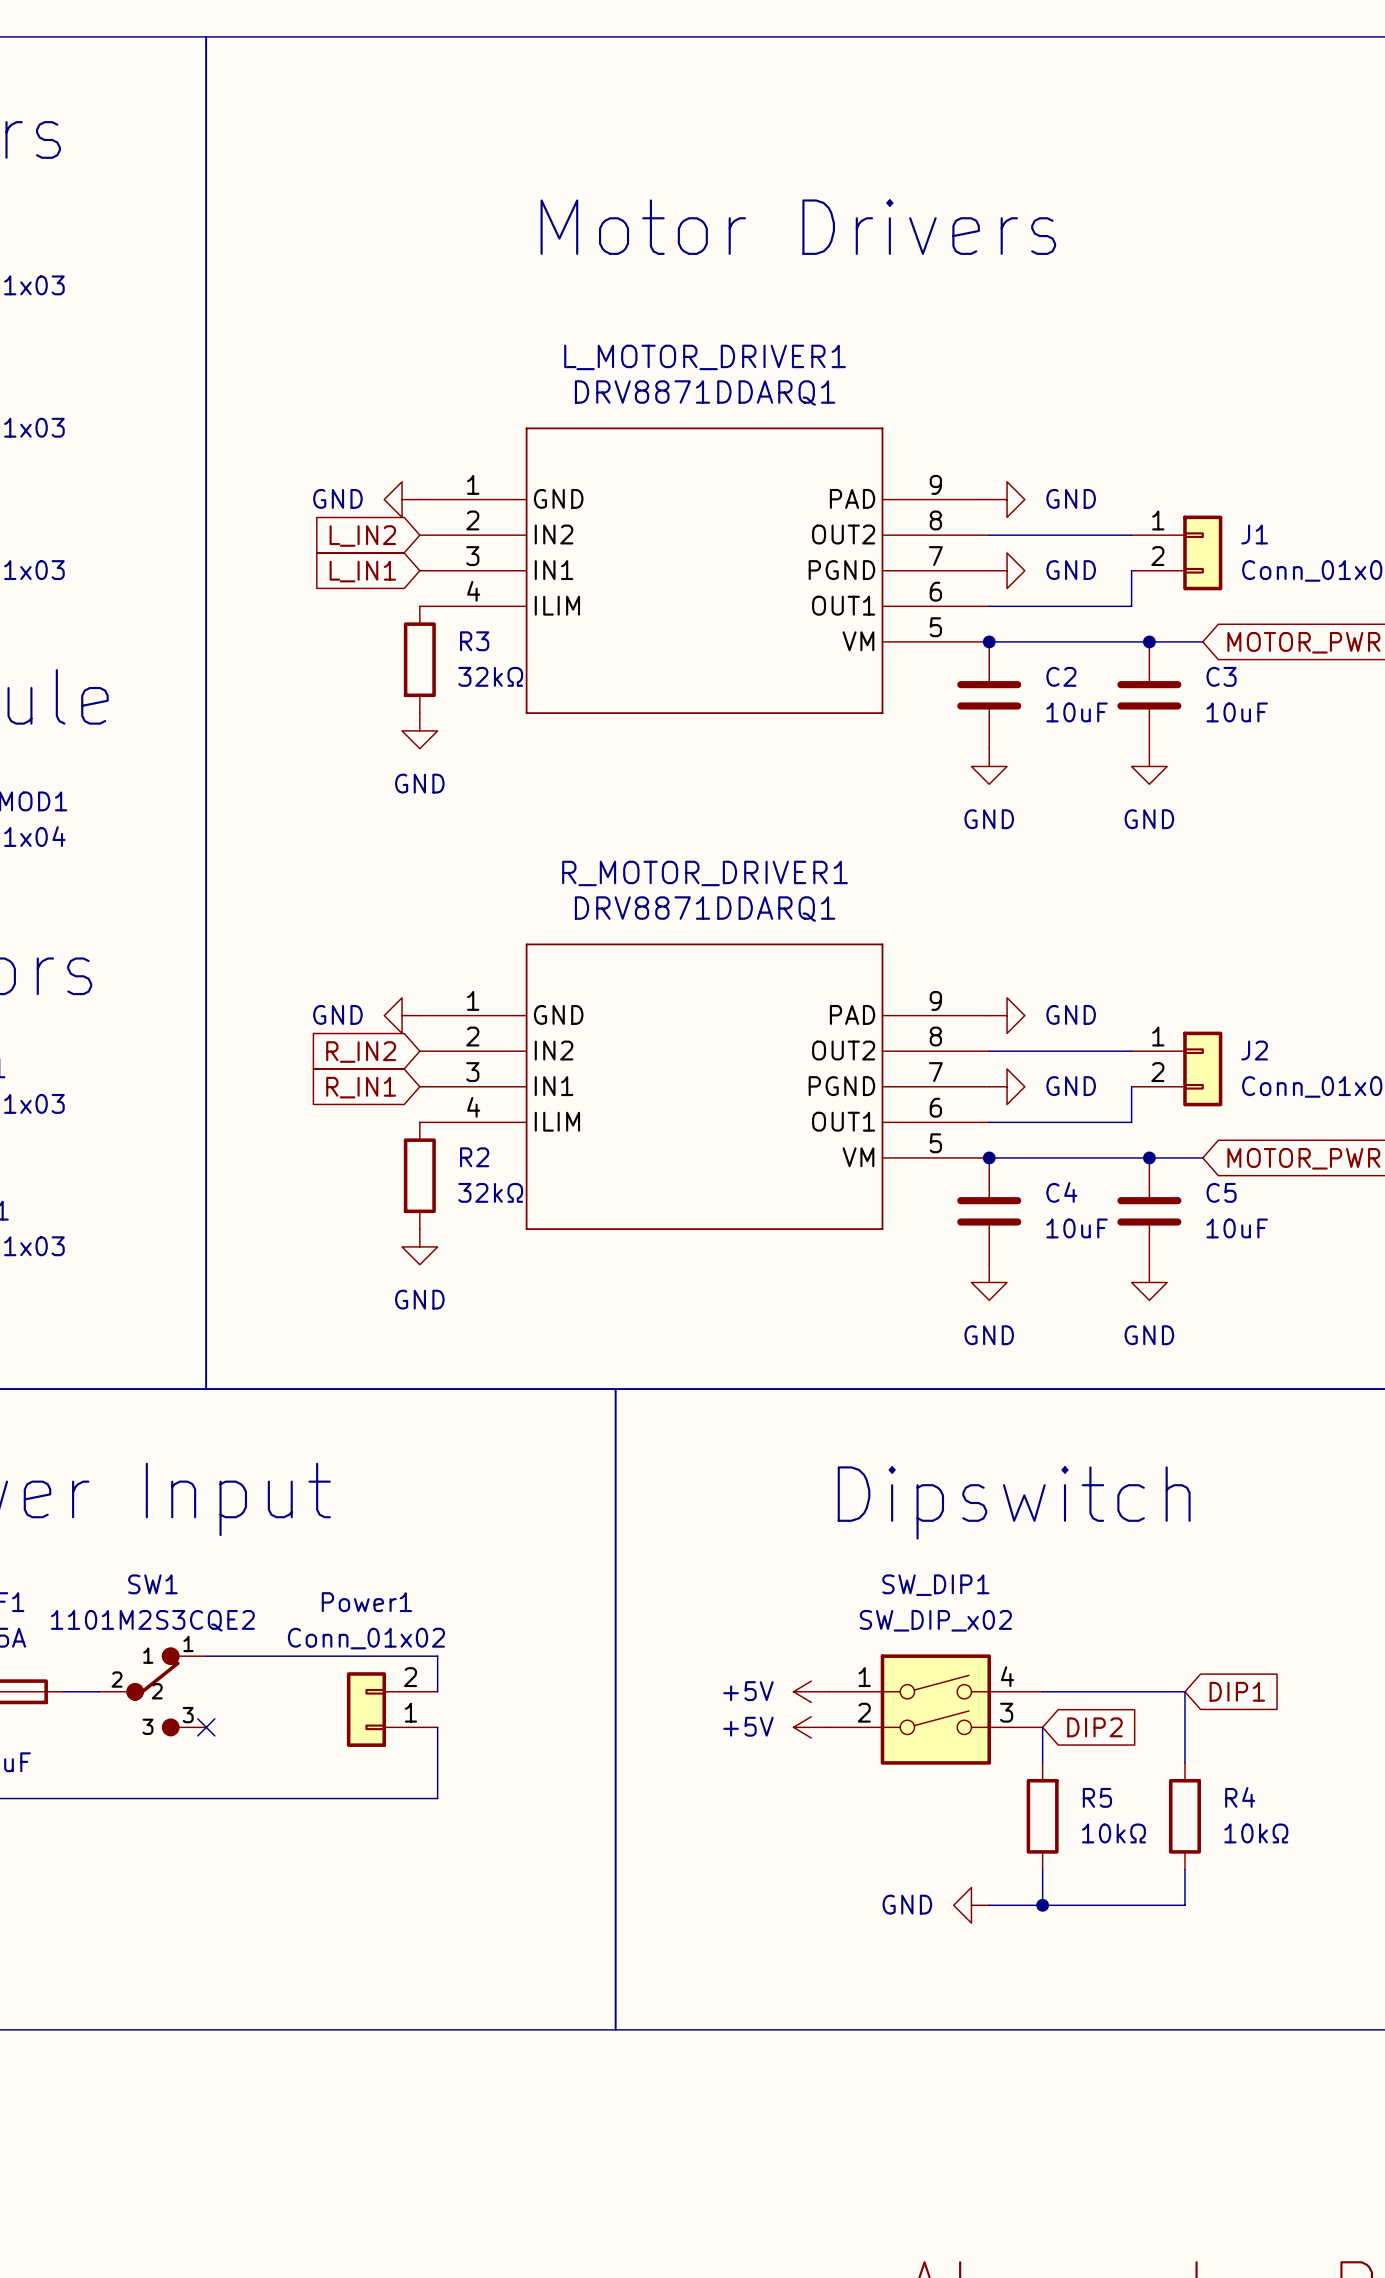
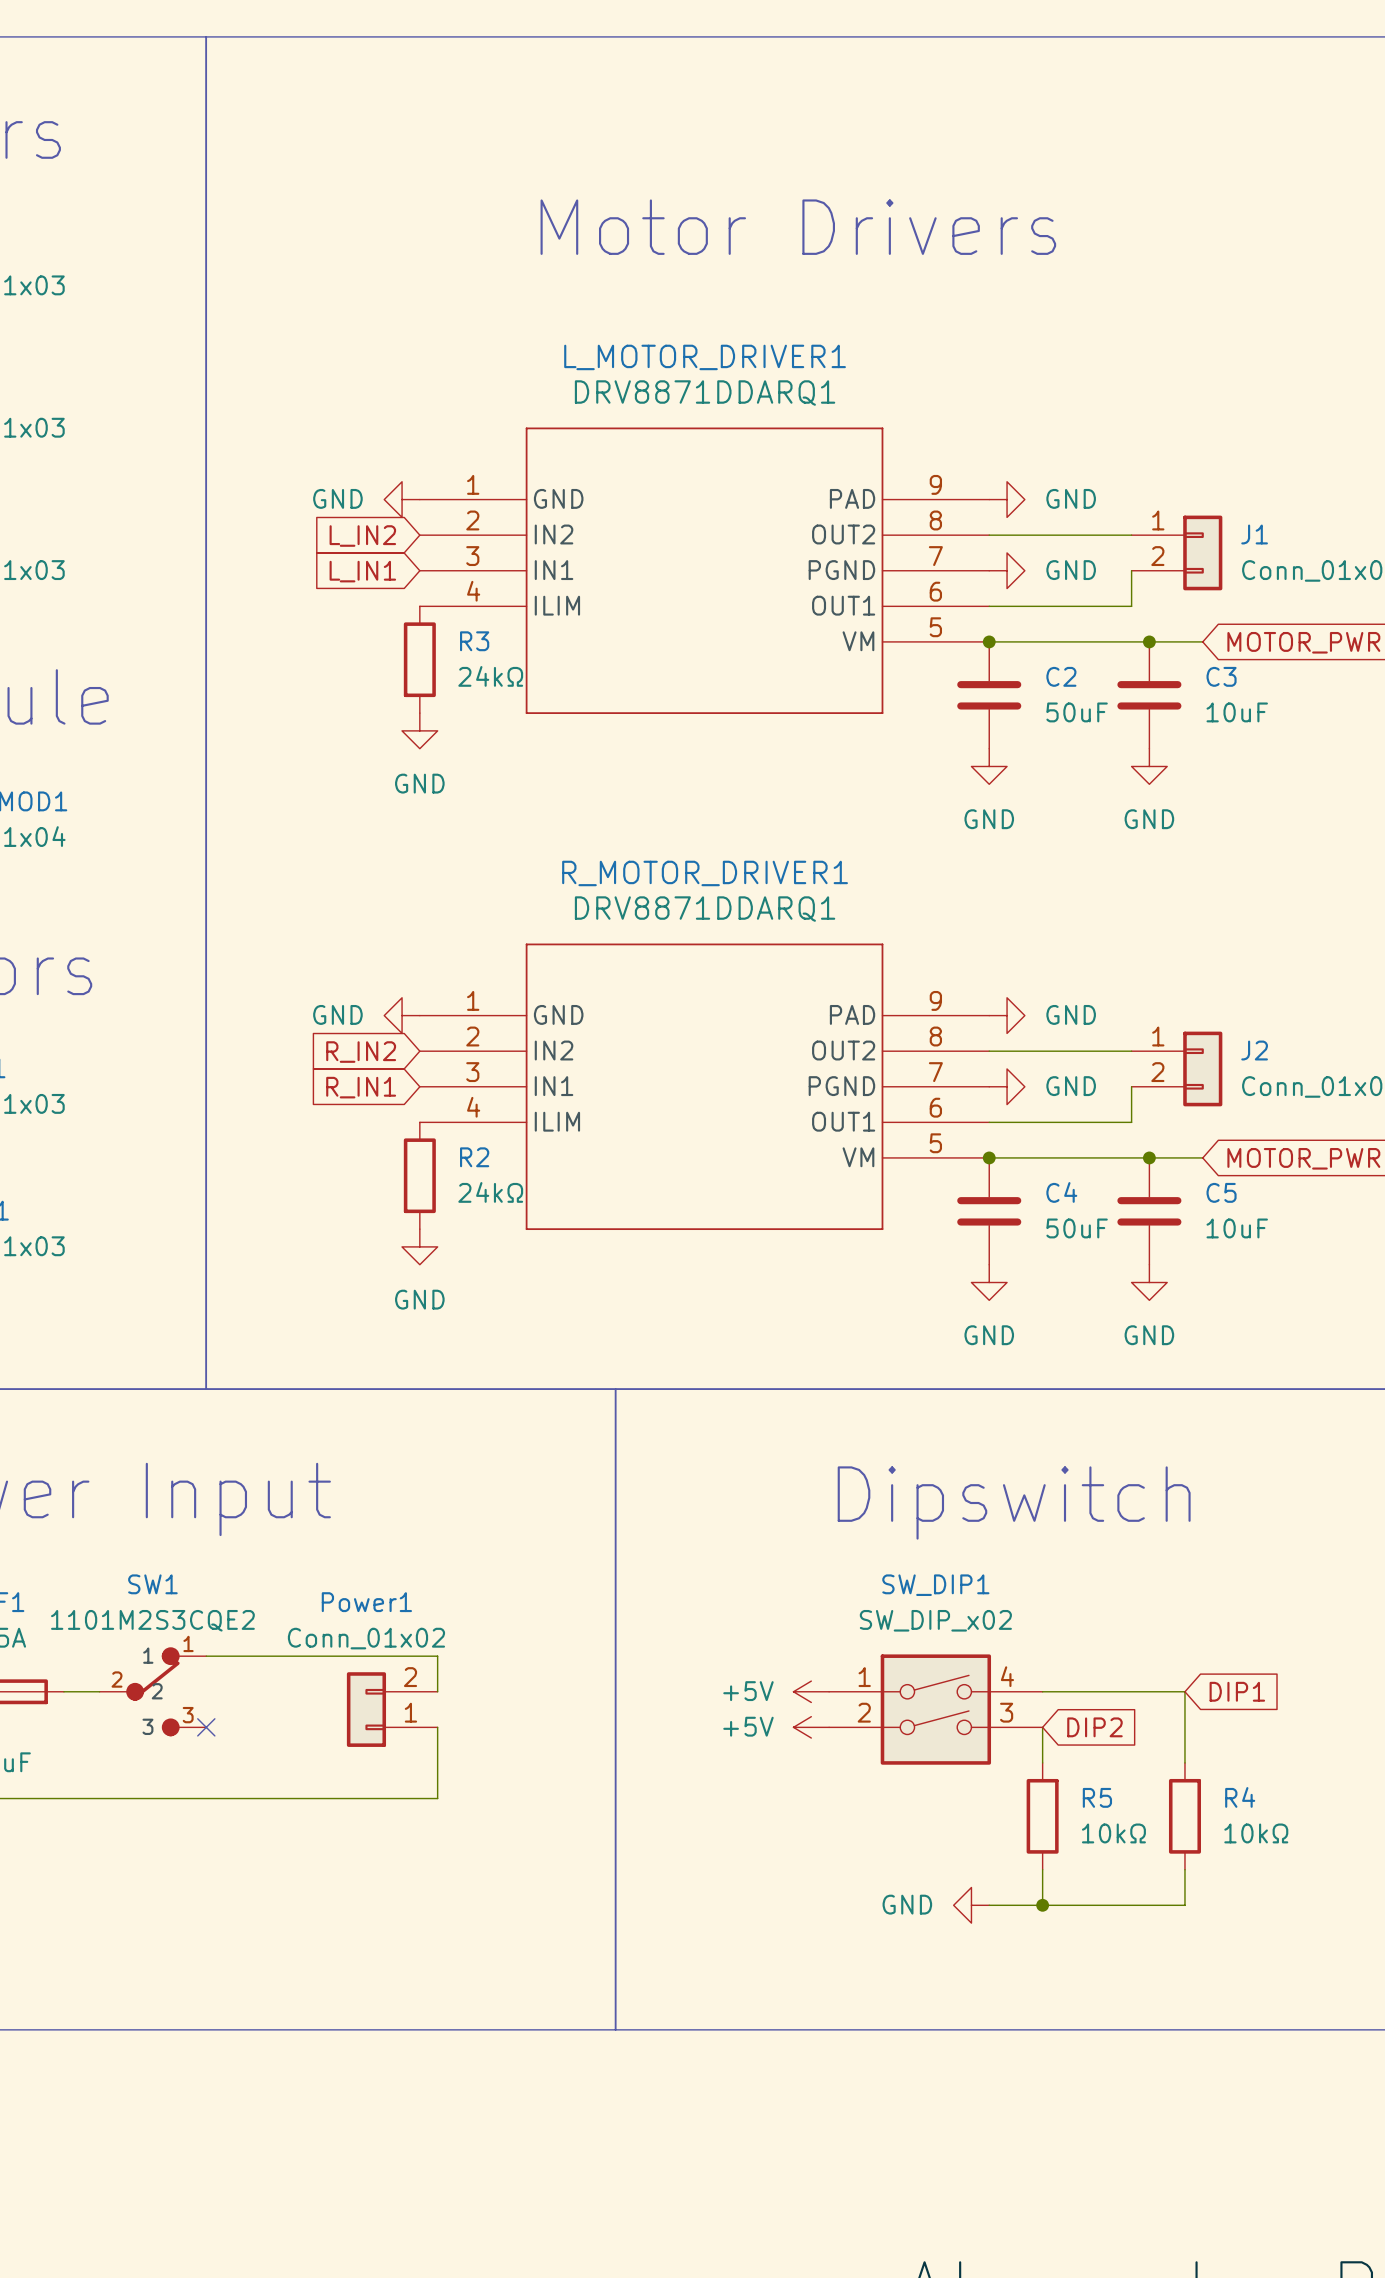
R3 value: 32kΩ (490, 676) -> 24kΩ (490, 676)
C2 value: 10uF (1077, 712) -> 50uF (1077, 712)
R2 value: 32kΩ (490, 1192) -> 24kΩ (490, 1192)
C4 value: 10uF (1077, 1228) -> 50uF (1077, 1228)

